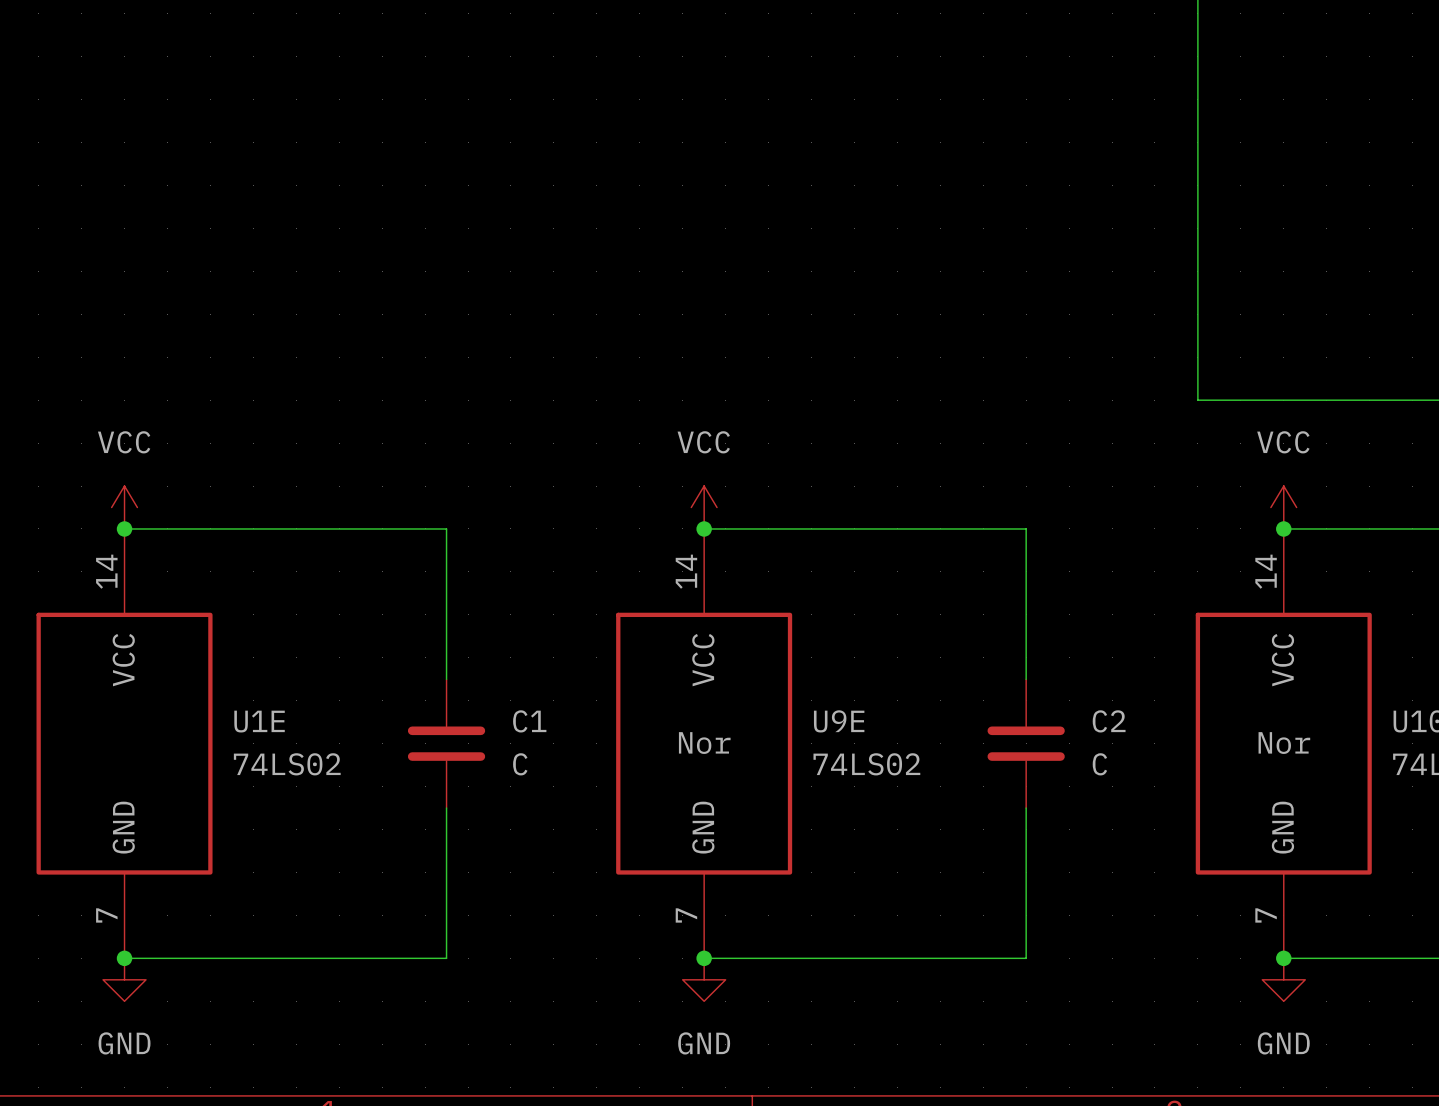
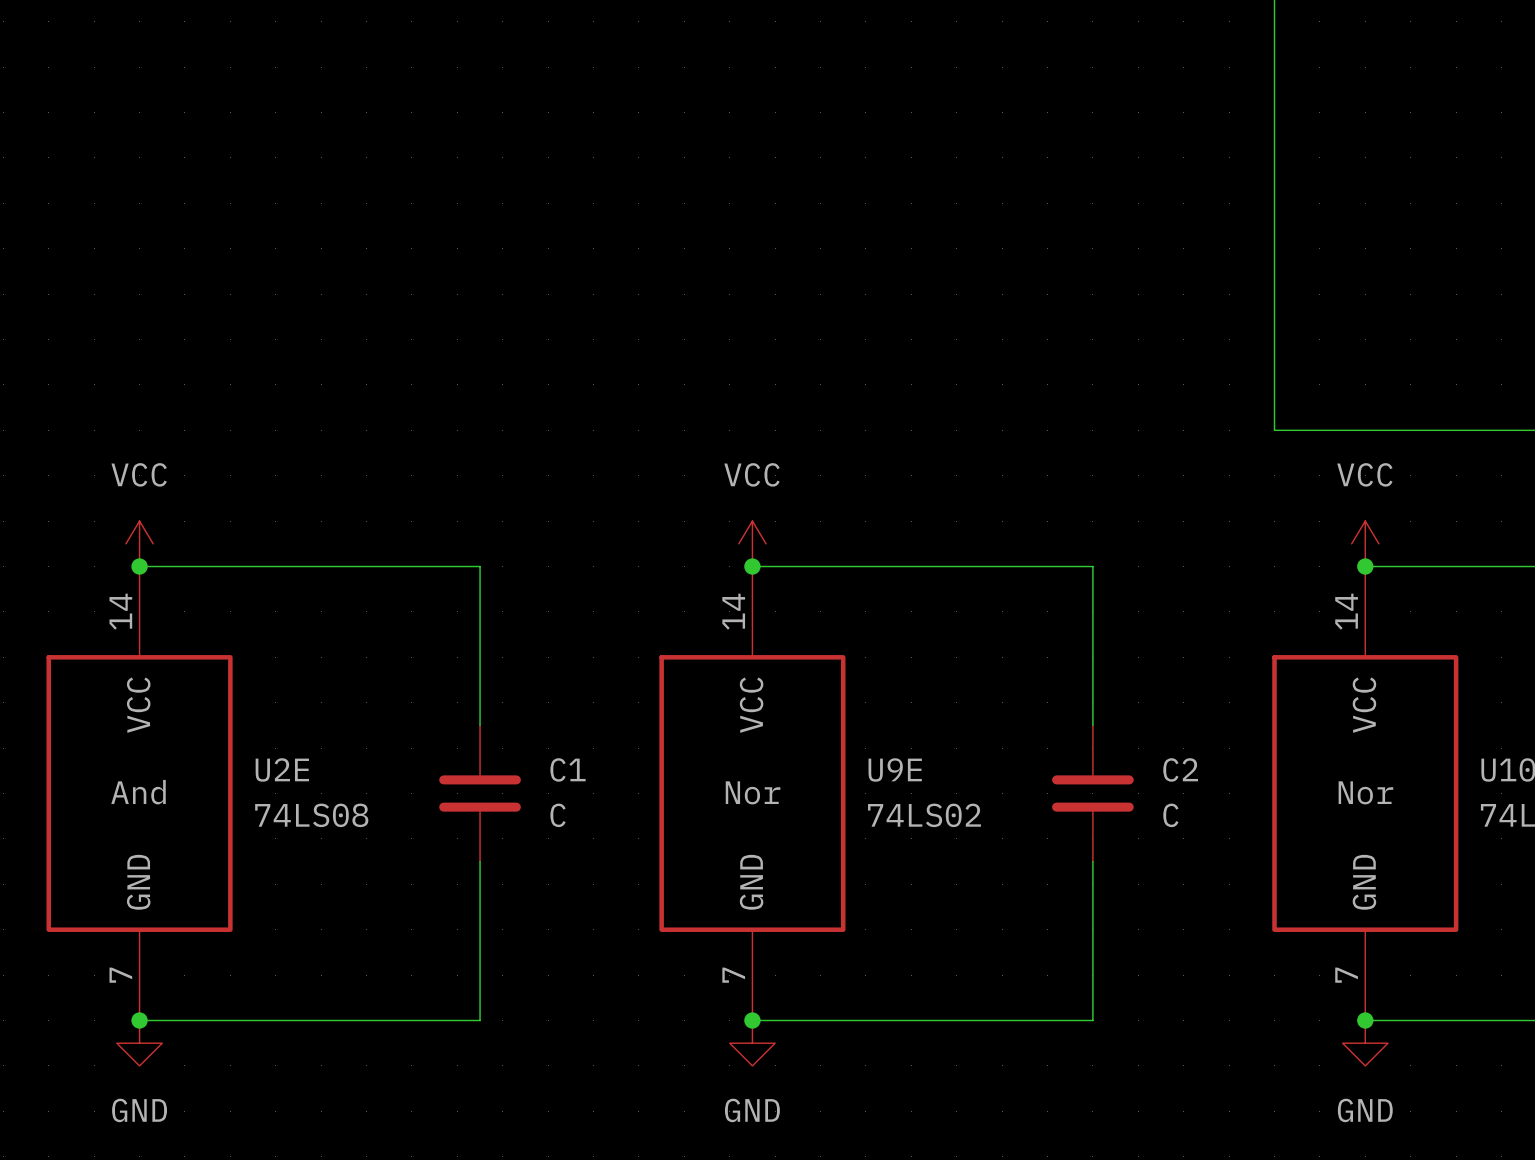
U1E name: U1E (259, 721) -> U2E (282, 769)
U1E text: none -> And (138, 792)
U1E value: 74LS02 (287, 764) -> 74LS08 (311, 815)

